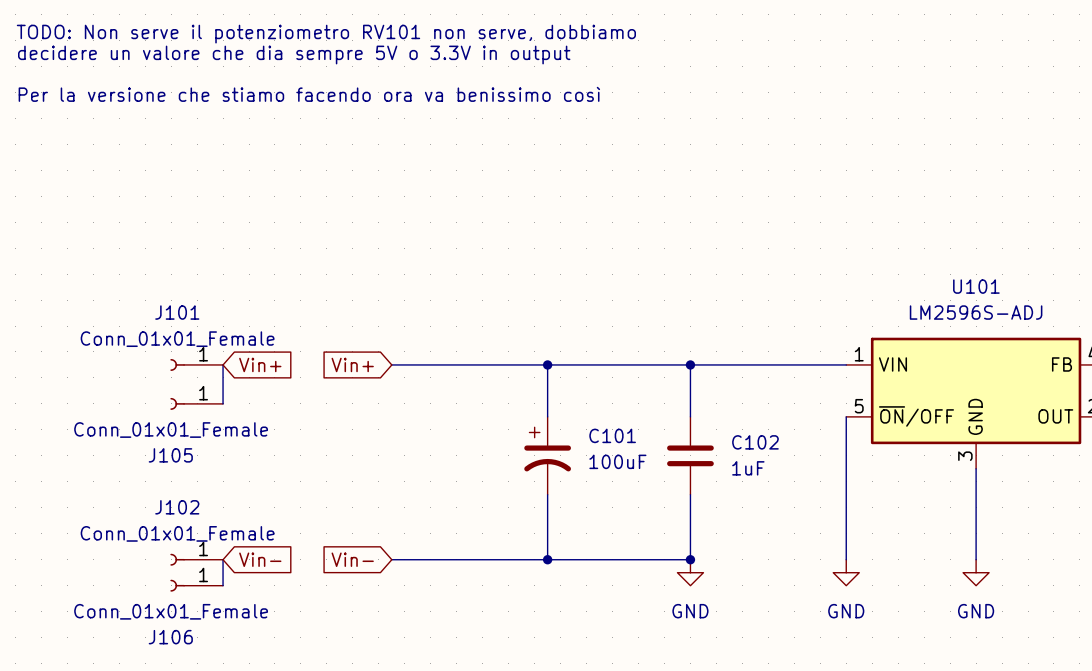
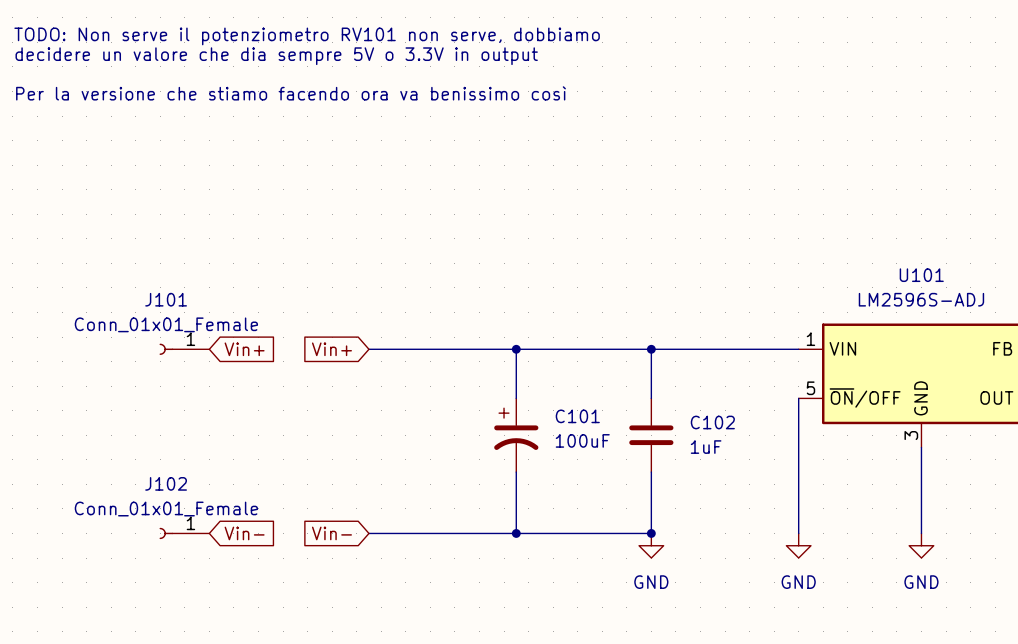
wire: (223, 364) (223, 403) -> none
J105: Conn_01x01_Female (196, 403) -> none
wire: (223, 559) (223, 585) -> none
J106: Conn_01x01_Female (196, 585) -> none

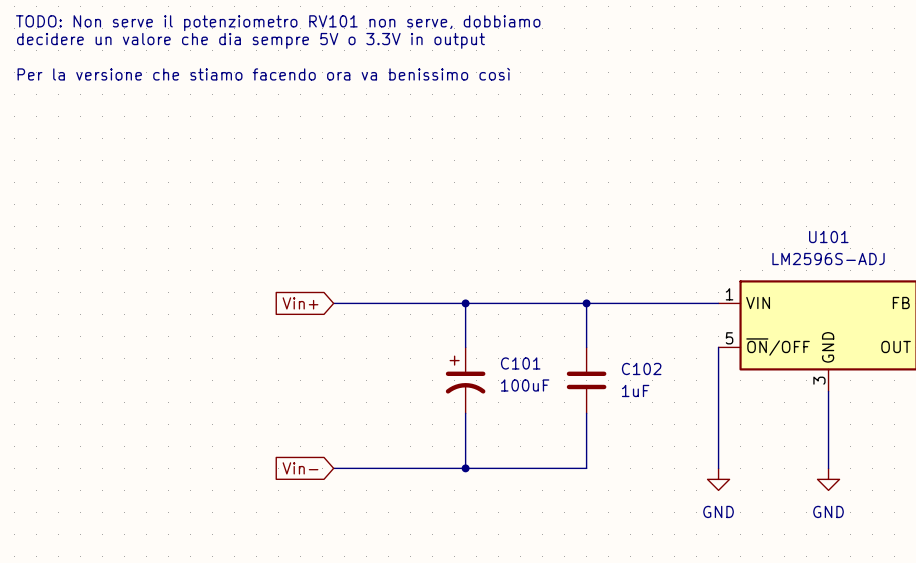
J101: Conn_01x01_Female (184, 349) -> none
global label: Vin+ (244, 349) -> none
J102: Conn_01x01_Female (184, 533) -> none
global label: Vin- (244, 533) -> none
junction: (651, 533) -> none
power symbol: GND (651, 545) -> none

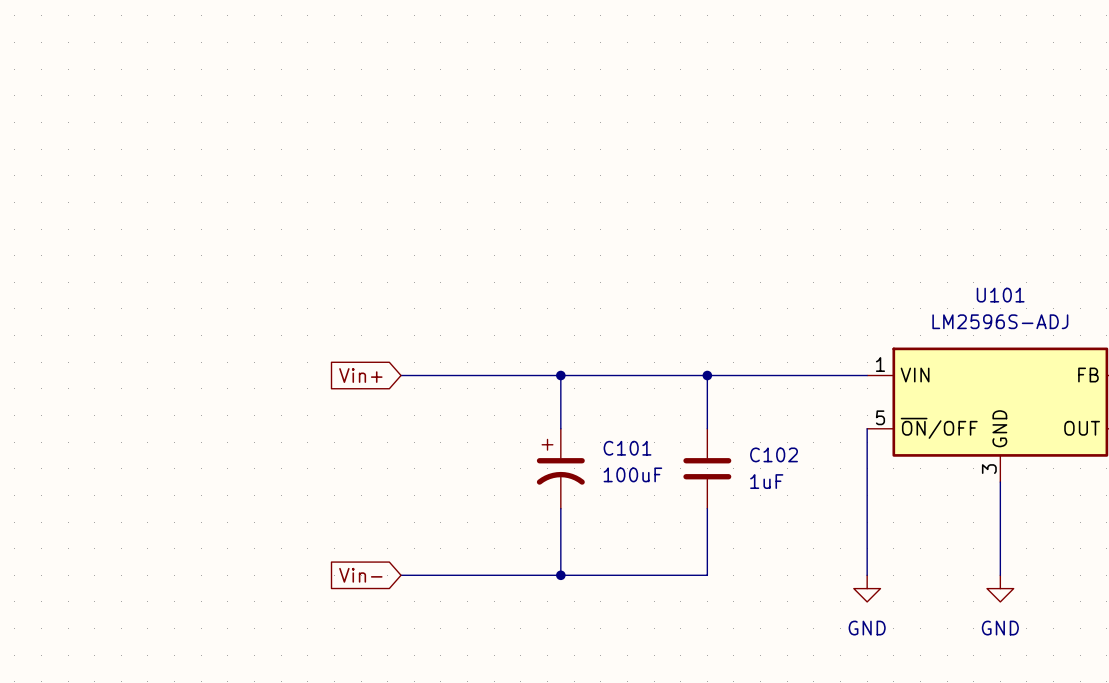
text: TODO: Non serve il potenziometro RV101 non serve, dobbiamo (278, 23) -> none
text: decidere un valore che dia sempre 5V o 3.3V in output (250, 40) -> none
text: Per la versione che stiamo facendo ora va benissimo così (263, 74) -> none

